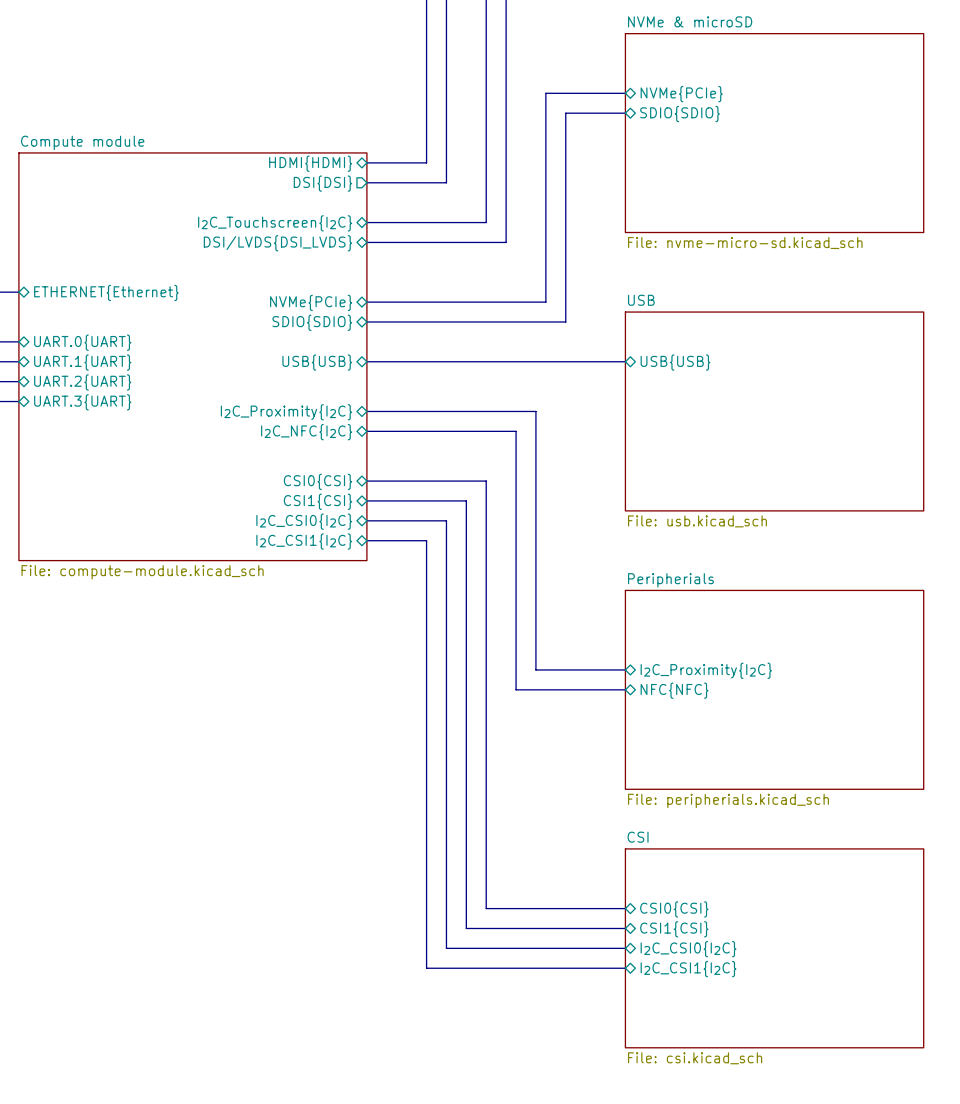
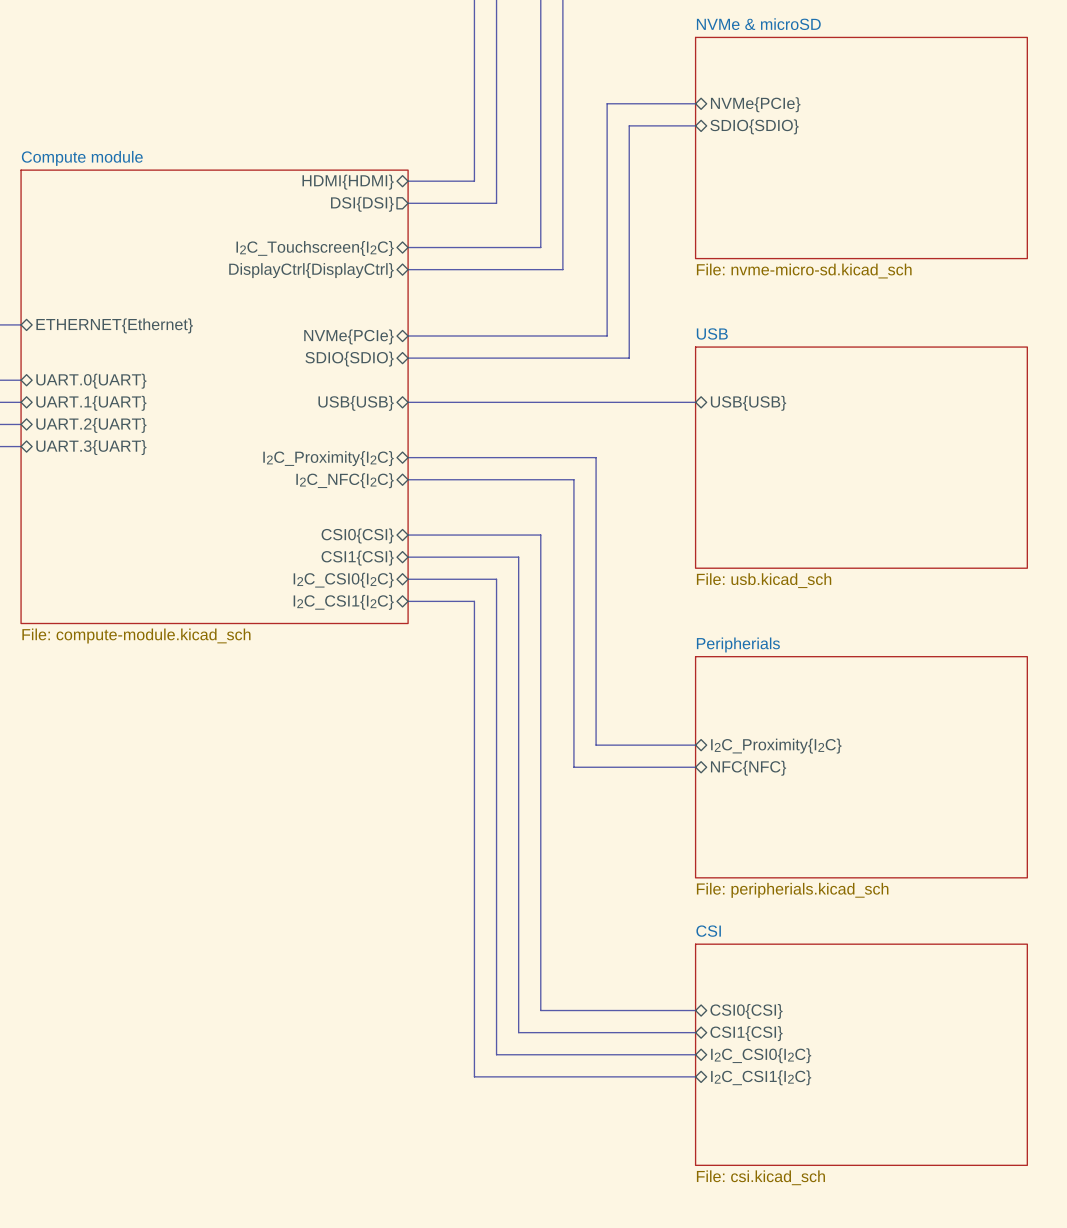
sheet pin: DSI/LVDS{DSI_LVDS} (277, 243) -> DisplayCtrl{DisplayCtrl} (311, 270)

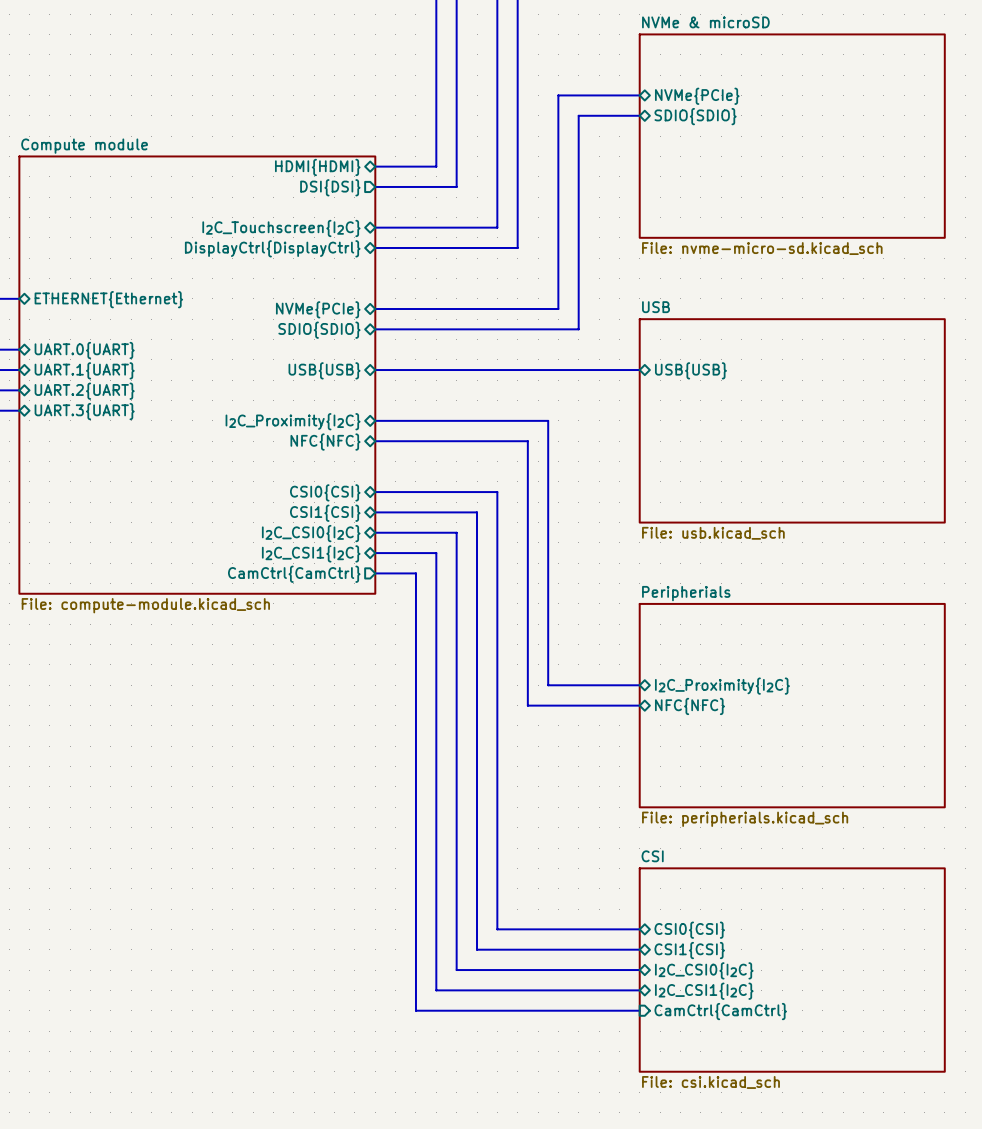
sheet Compute module: File: compute-module.kicad_sch (214, 396) -> none
sheet Compute module: none -> File: compute-module.kicad_sch (197, 375)
sheet pin: I2C_NFC{I2C} (345, 480) -> NFC{NFC} (325, 442)
bus: none -> (375, 573) (415, 573) (415, 1010) (639, 1010)
sheet pin: none -> CamCtrl{CamCtrl} (294, 574)
sheet pin: none -> CamCtrl{CamCtrl} (720, 1011)

